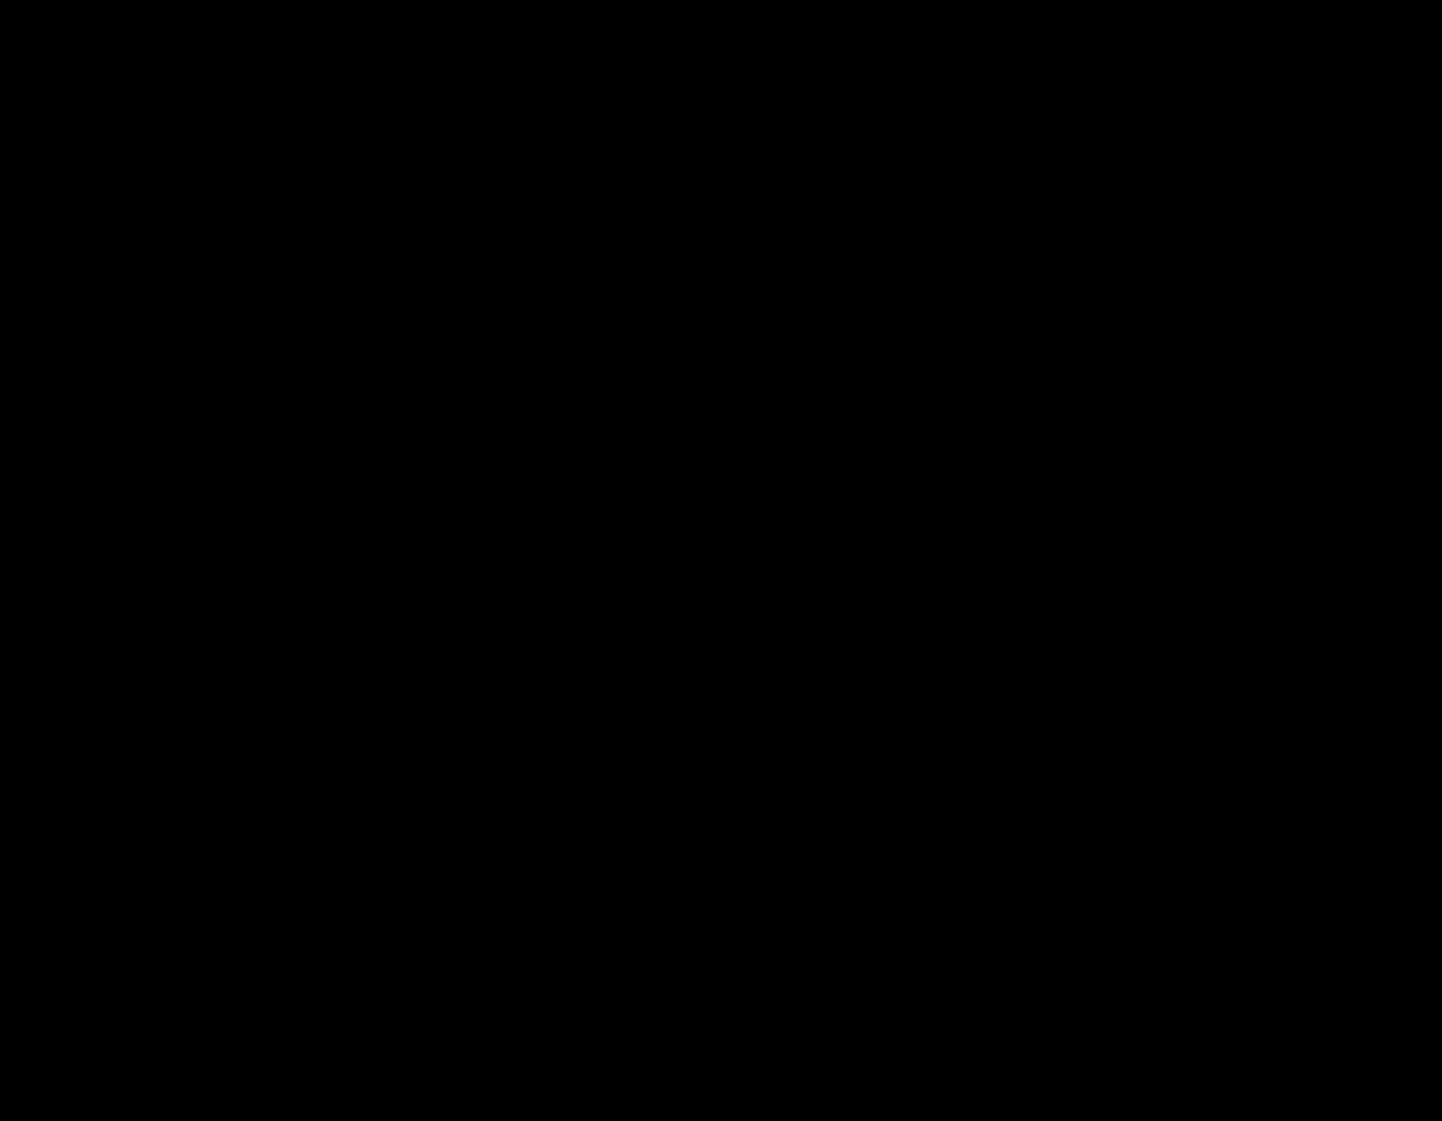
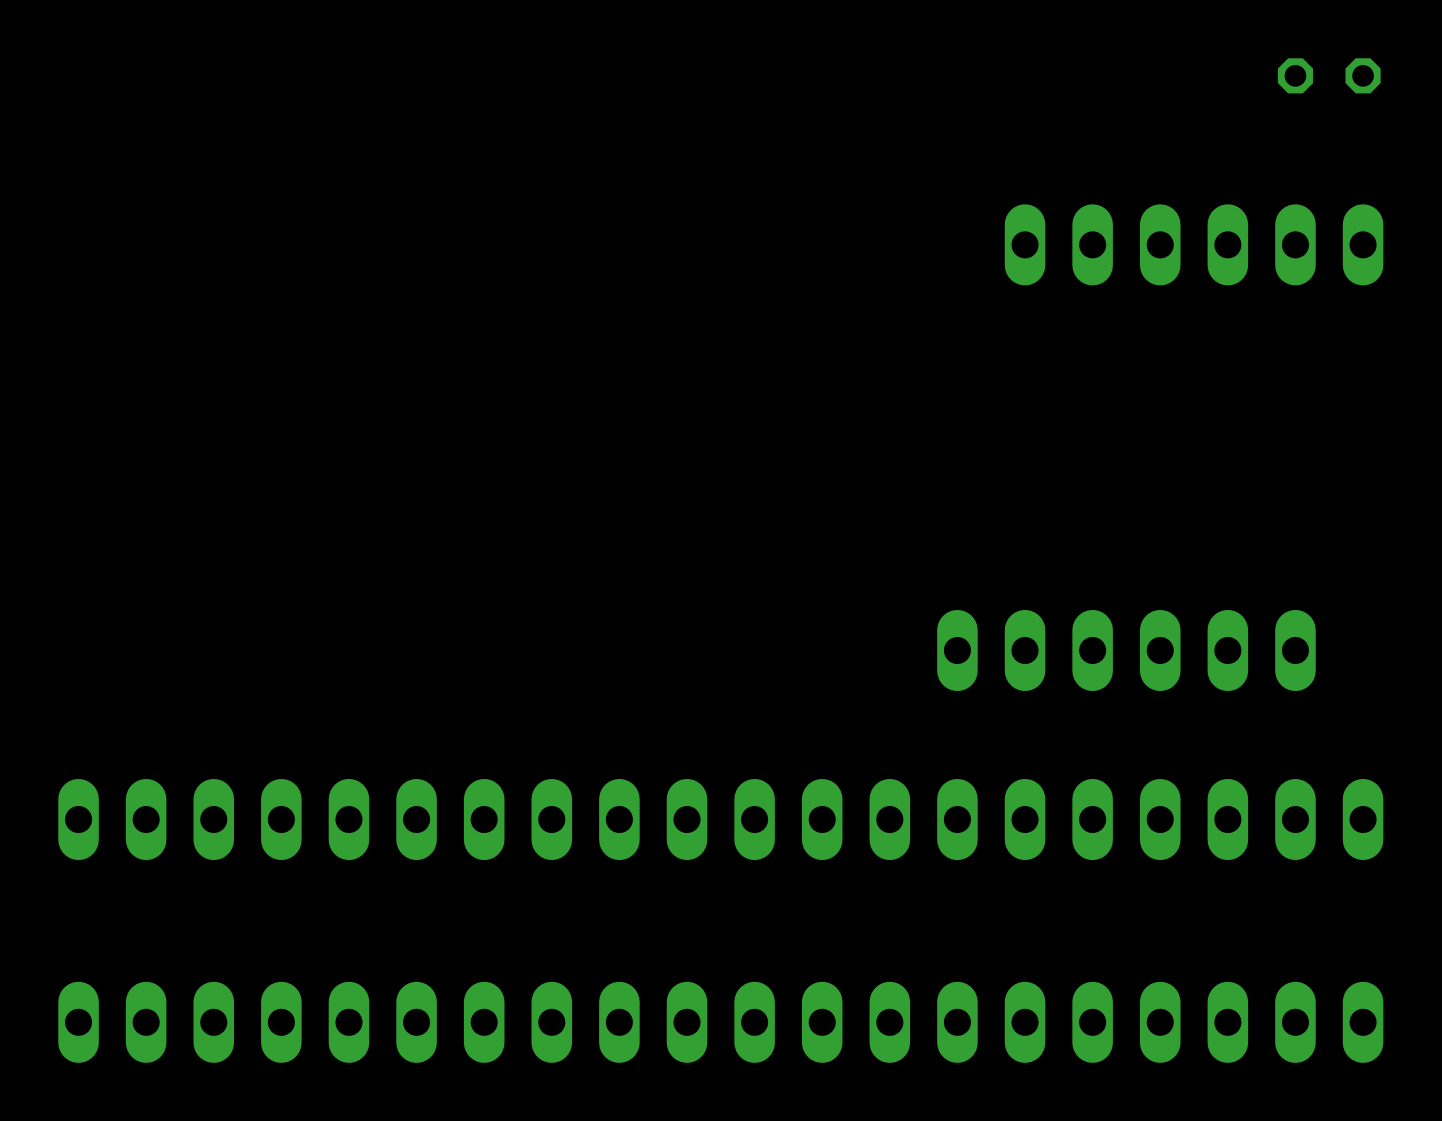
part: none -> (1329, 75)
part: none -> (1194, 244)
part: none -> (1126, 650)
part: none -> (720, 819)
part: none -> (720, 1022)

